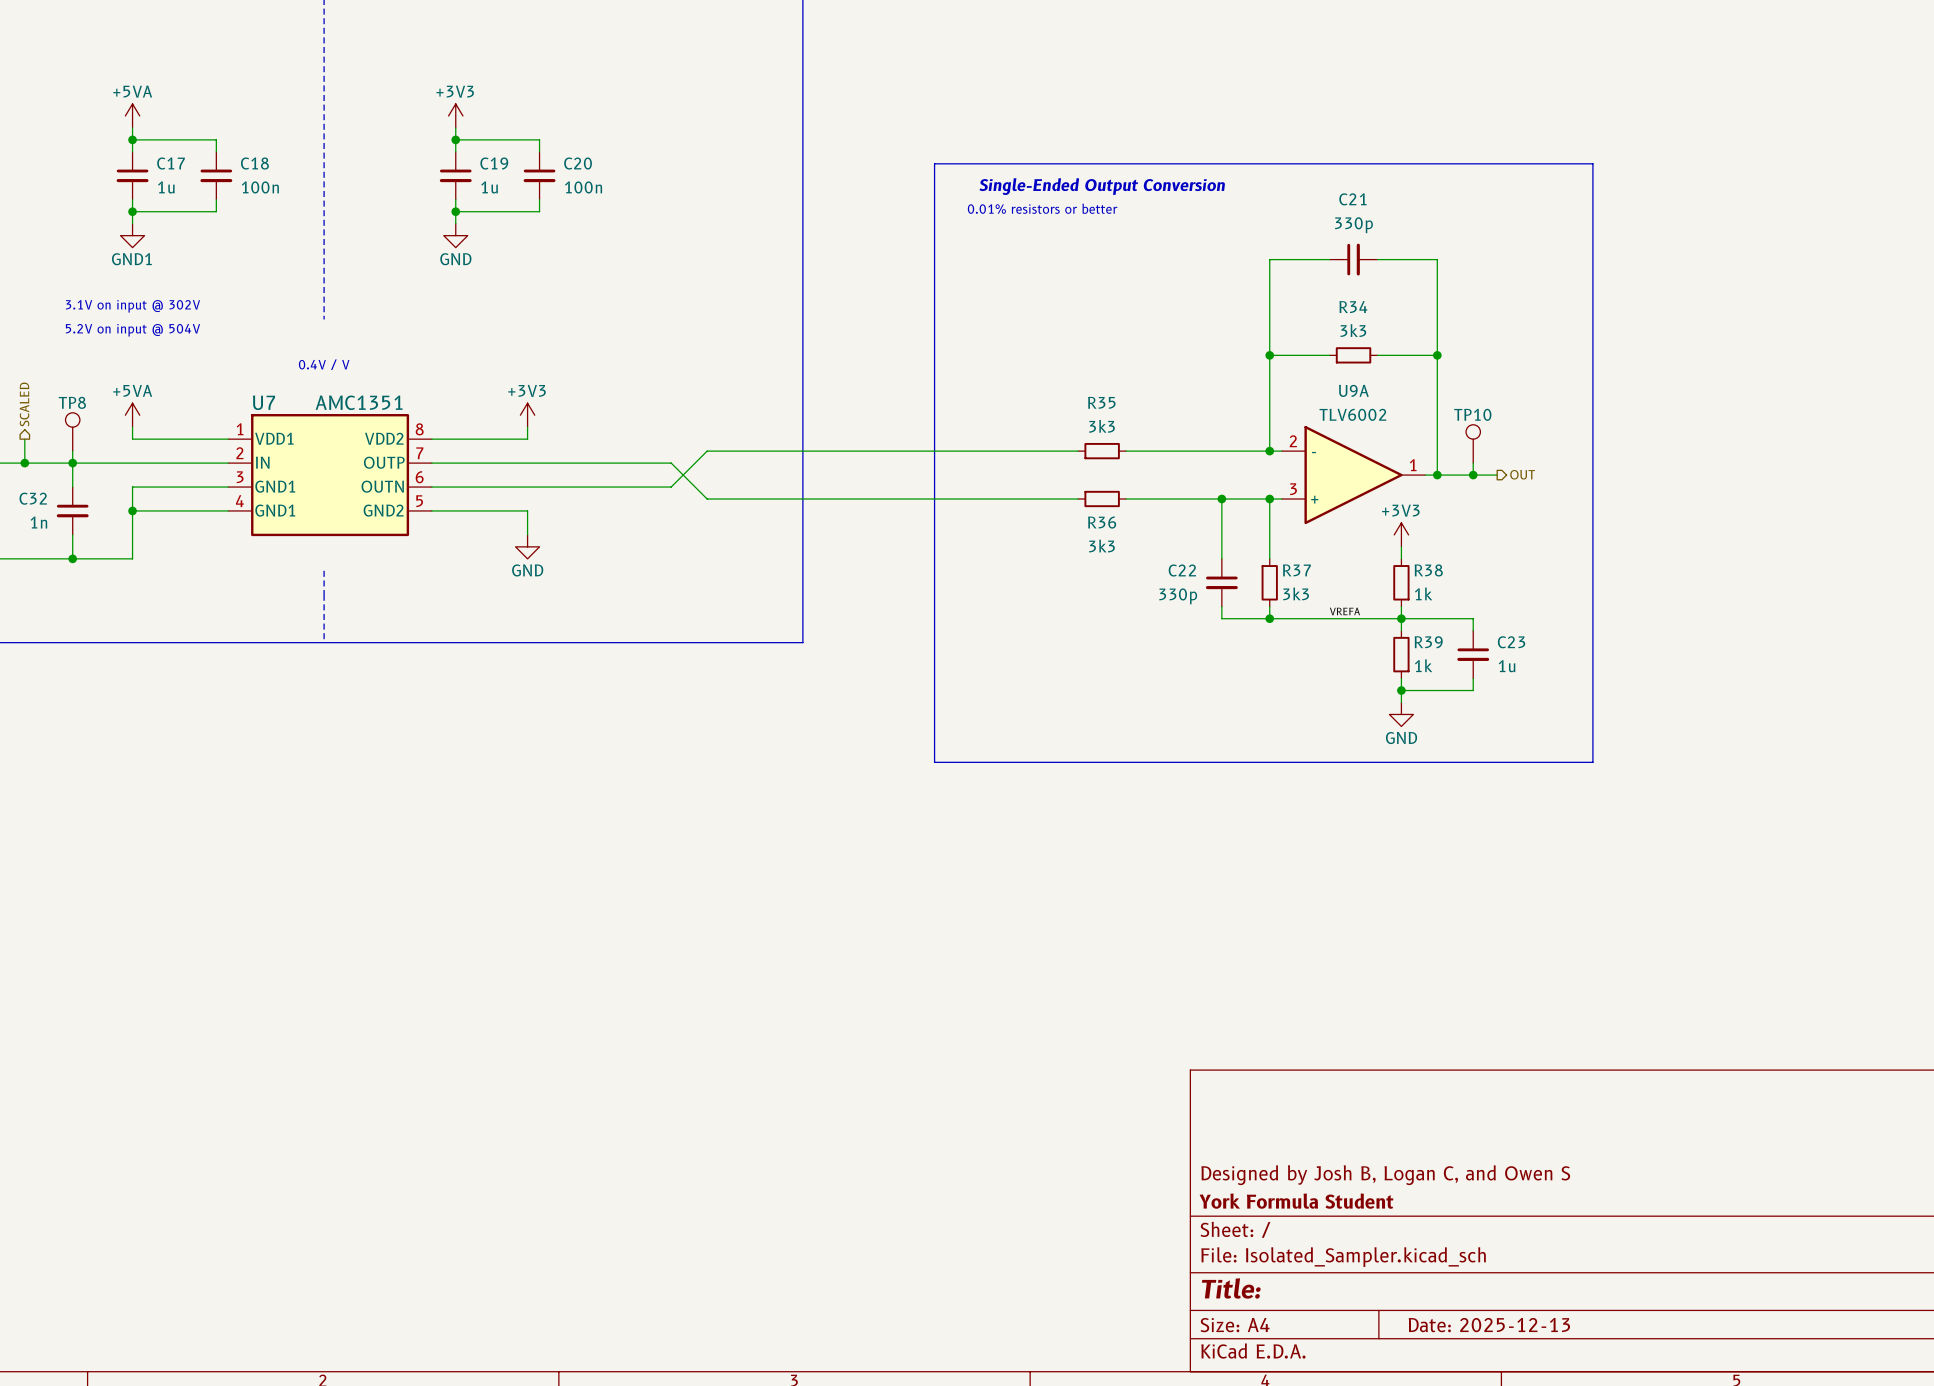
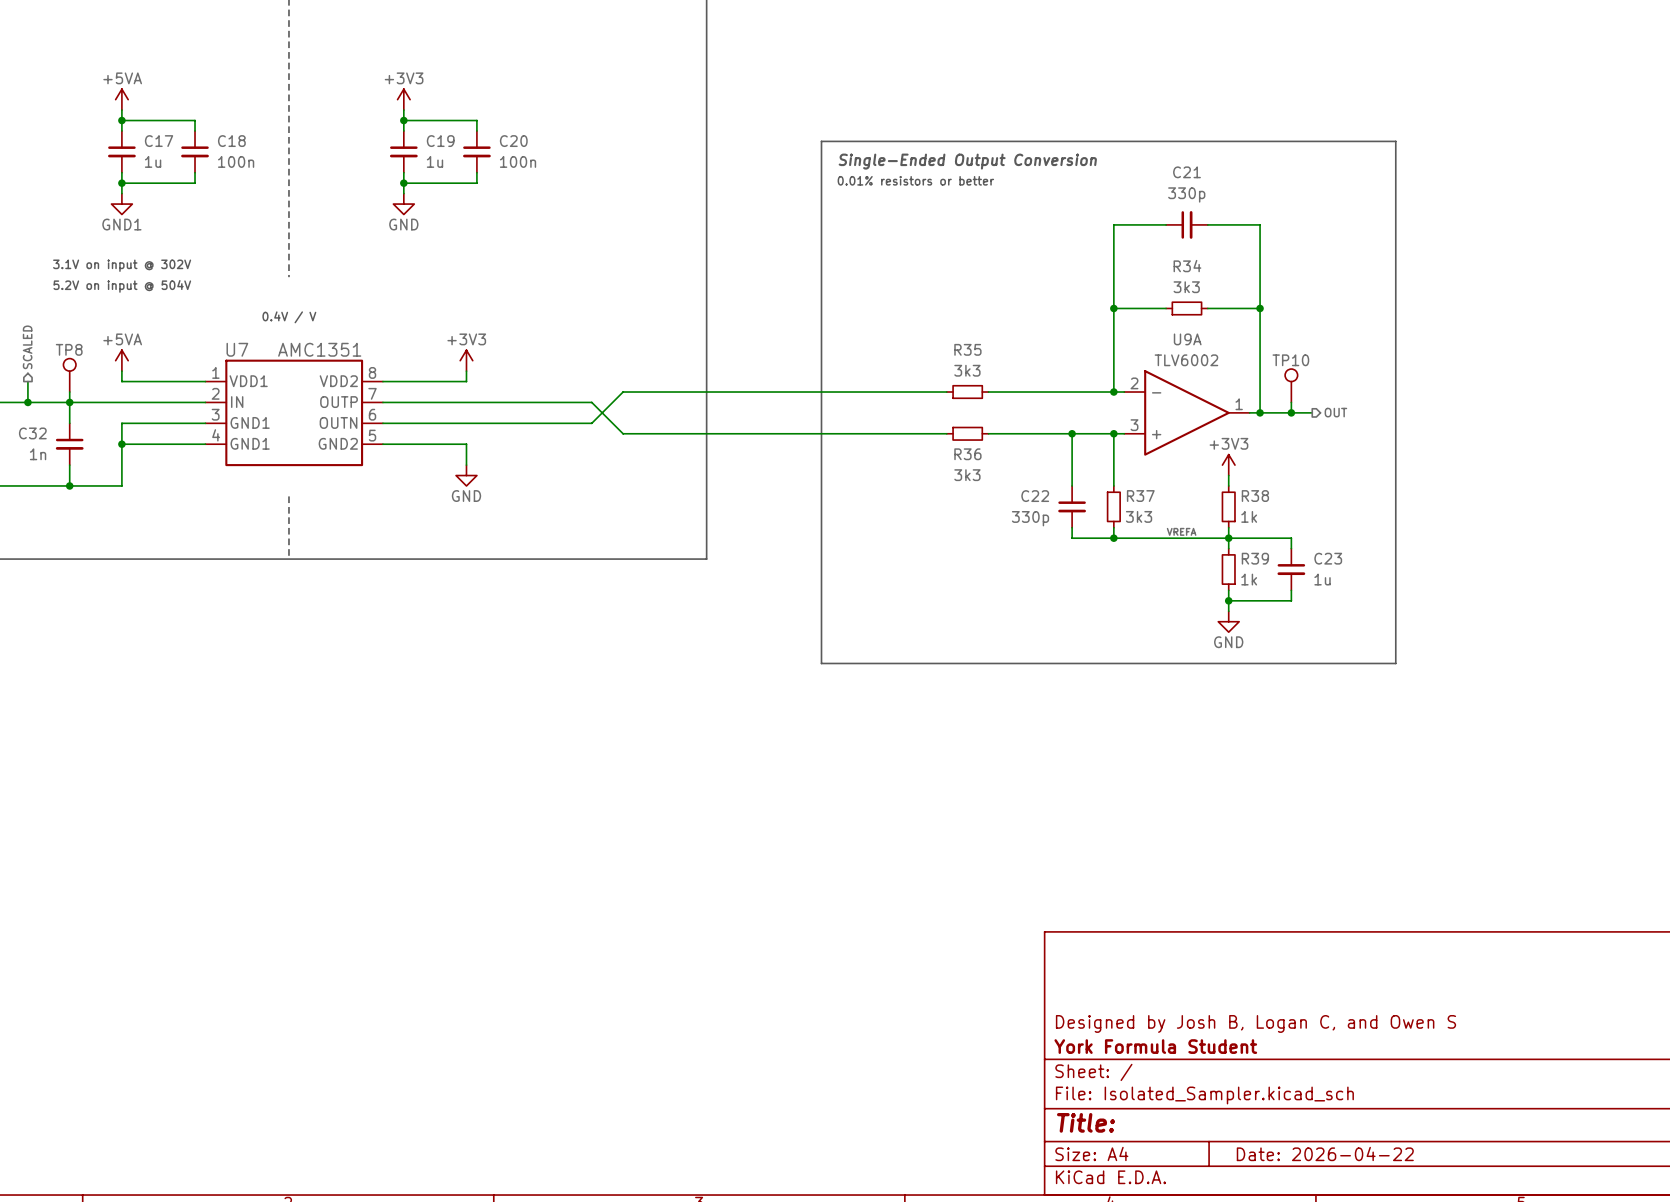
title block: Date: 2025-12-13 (1489, 1325) -> Date: 2026-04-22 (1325, 1153)

